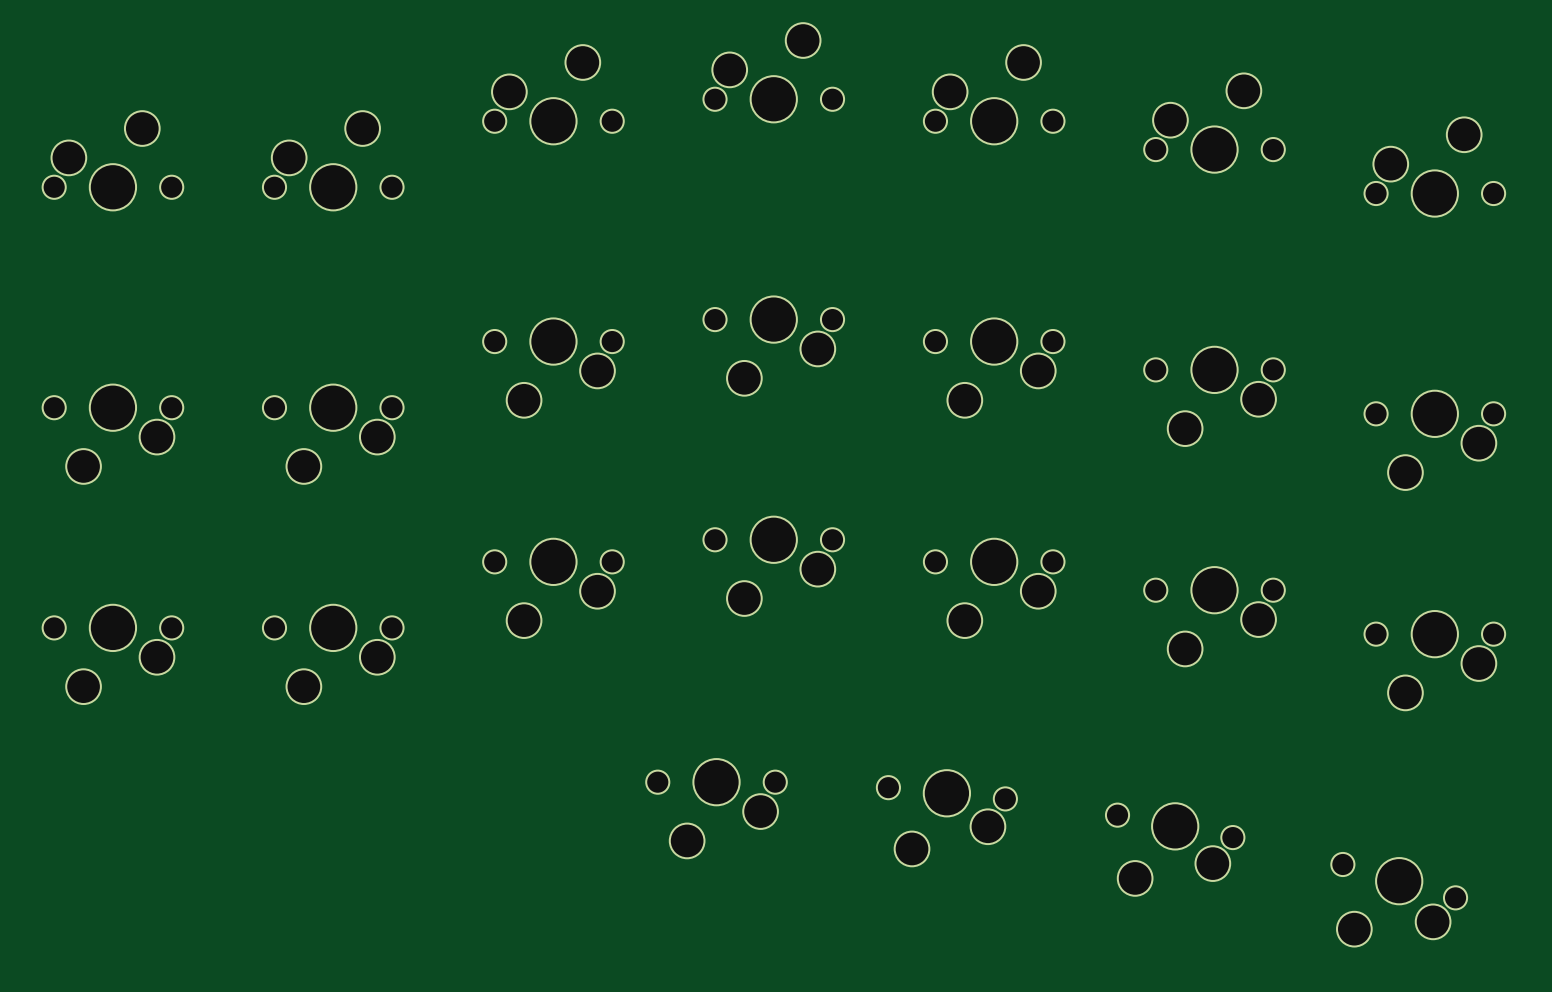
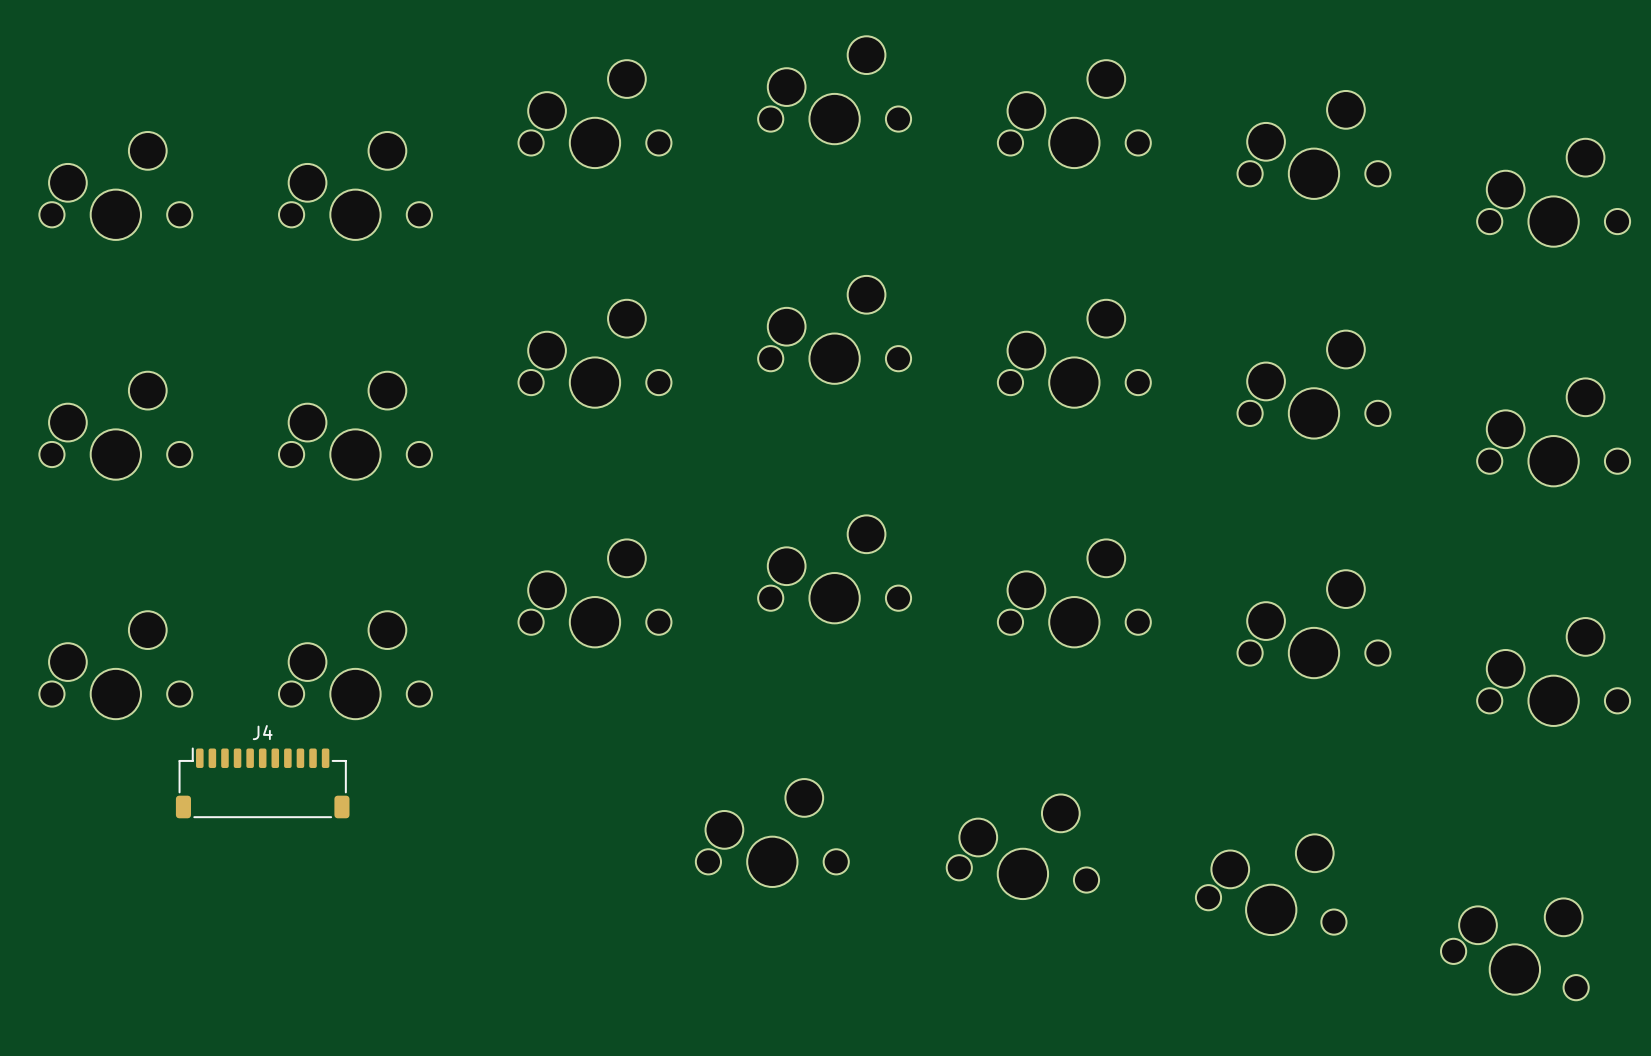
part rotation: 0° (773, 346) -> 180° (834, 329)
part rotation: 0° (553, 368) -> 180° (594, 353)
part rotation: 0° (994, 368) -> 180° (1074, 353)
part rotation: 0° (1214, 396) -> 180° (1313, 384)
part rotation: 0° (112, 434) -> 180° (115, 425)
part rotation: 0° (333, 434) -> 180° (355, 425)
part rotation: 0° (1434, 440) -> 180° (1553, 432)
part rotation: 0° (773, 566) -> 180° (834, 569)
part rotation: 0° (553, 588) -> 180° (594, 593)
part rotation: 0° (994, 588) -> 180° (1074, 593)
part rotation: 0° (1214, 616) -> 180° (1313, 624)
part rotation: 0° (112, 654) -> 180° (115, 665)
part rotation: 0° (333, 654) -> 180° (355, 665)
part rotation: 0° (1434, 660) -> 180° (1553, 672)
J4: none -> (262, 783)
part rotation: 0° (716, 808) -> 180° (772, 833)
part rotation: 0° (946, 818) -> 180° (1022, 846)
part rotation: 0° (1175, 849) -> 180° (1271, 884)
part rotation: 0° (1399, 899) -> 180° (1514, 949)

